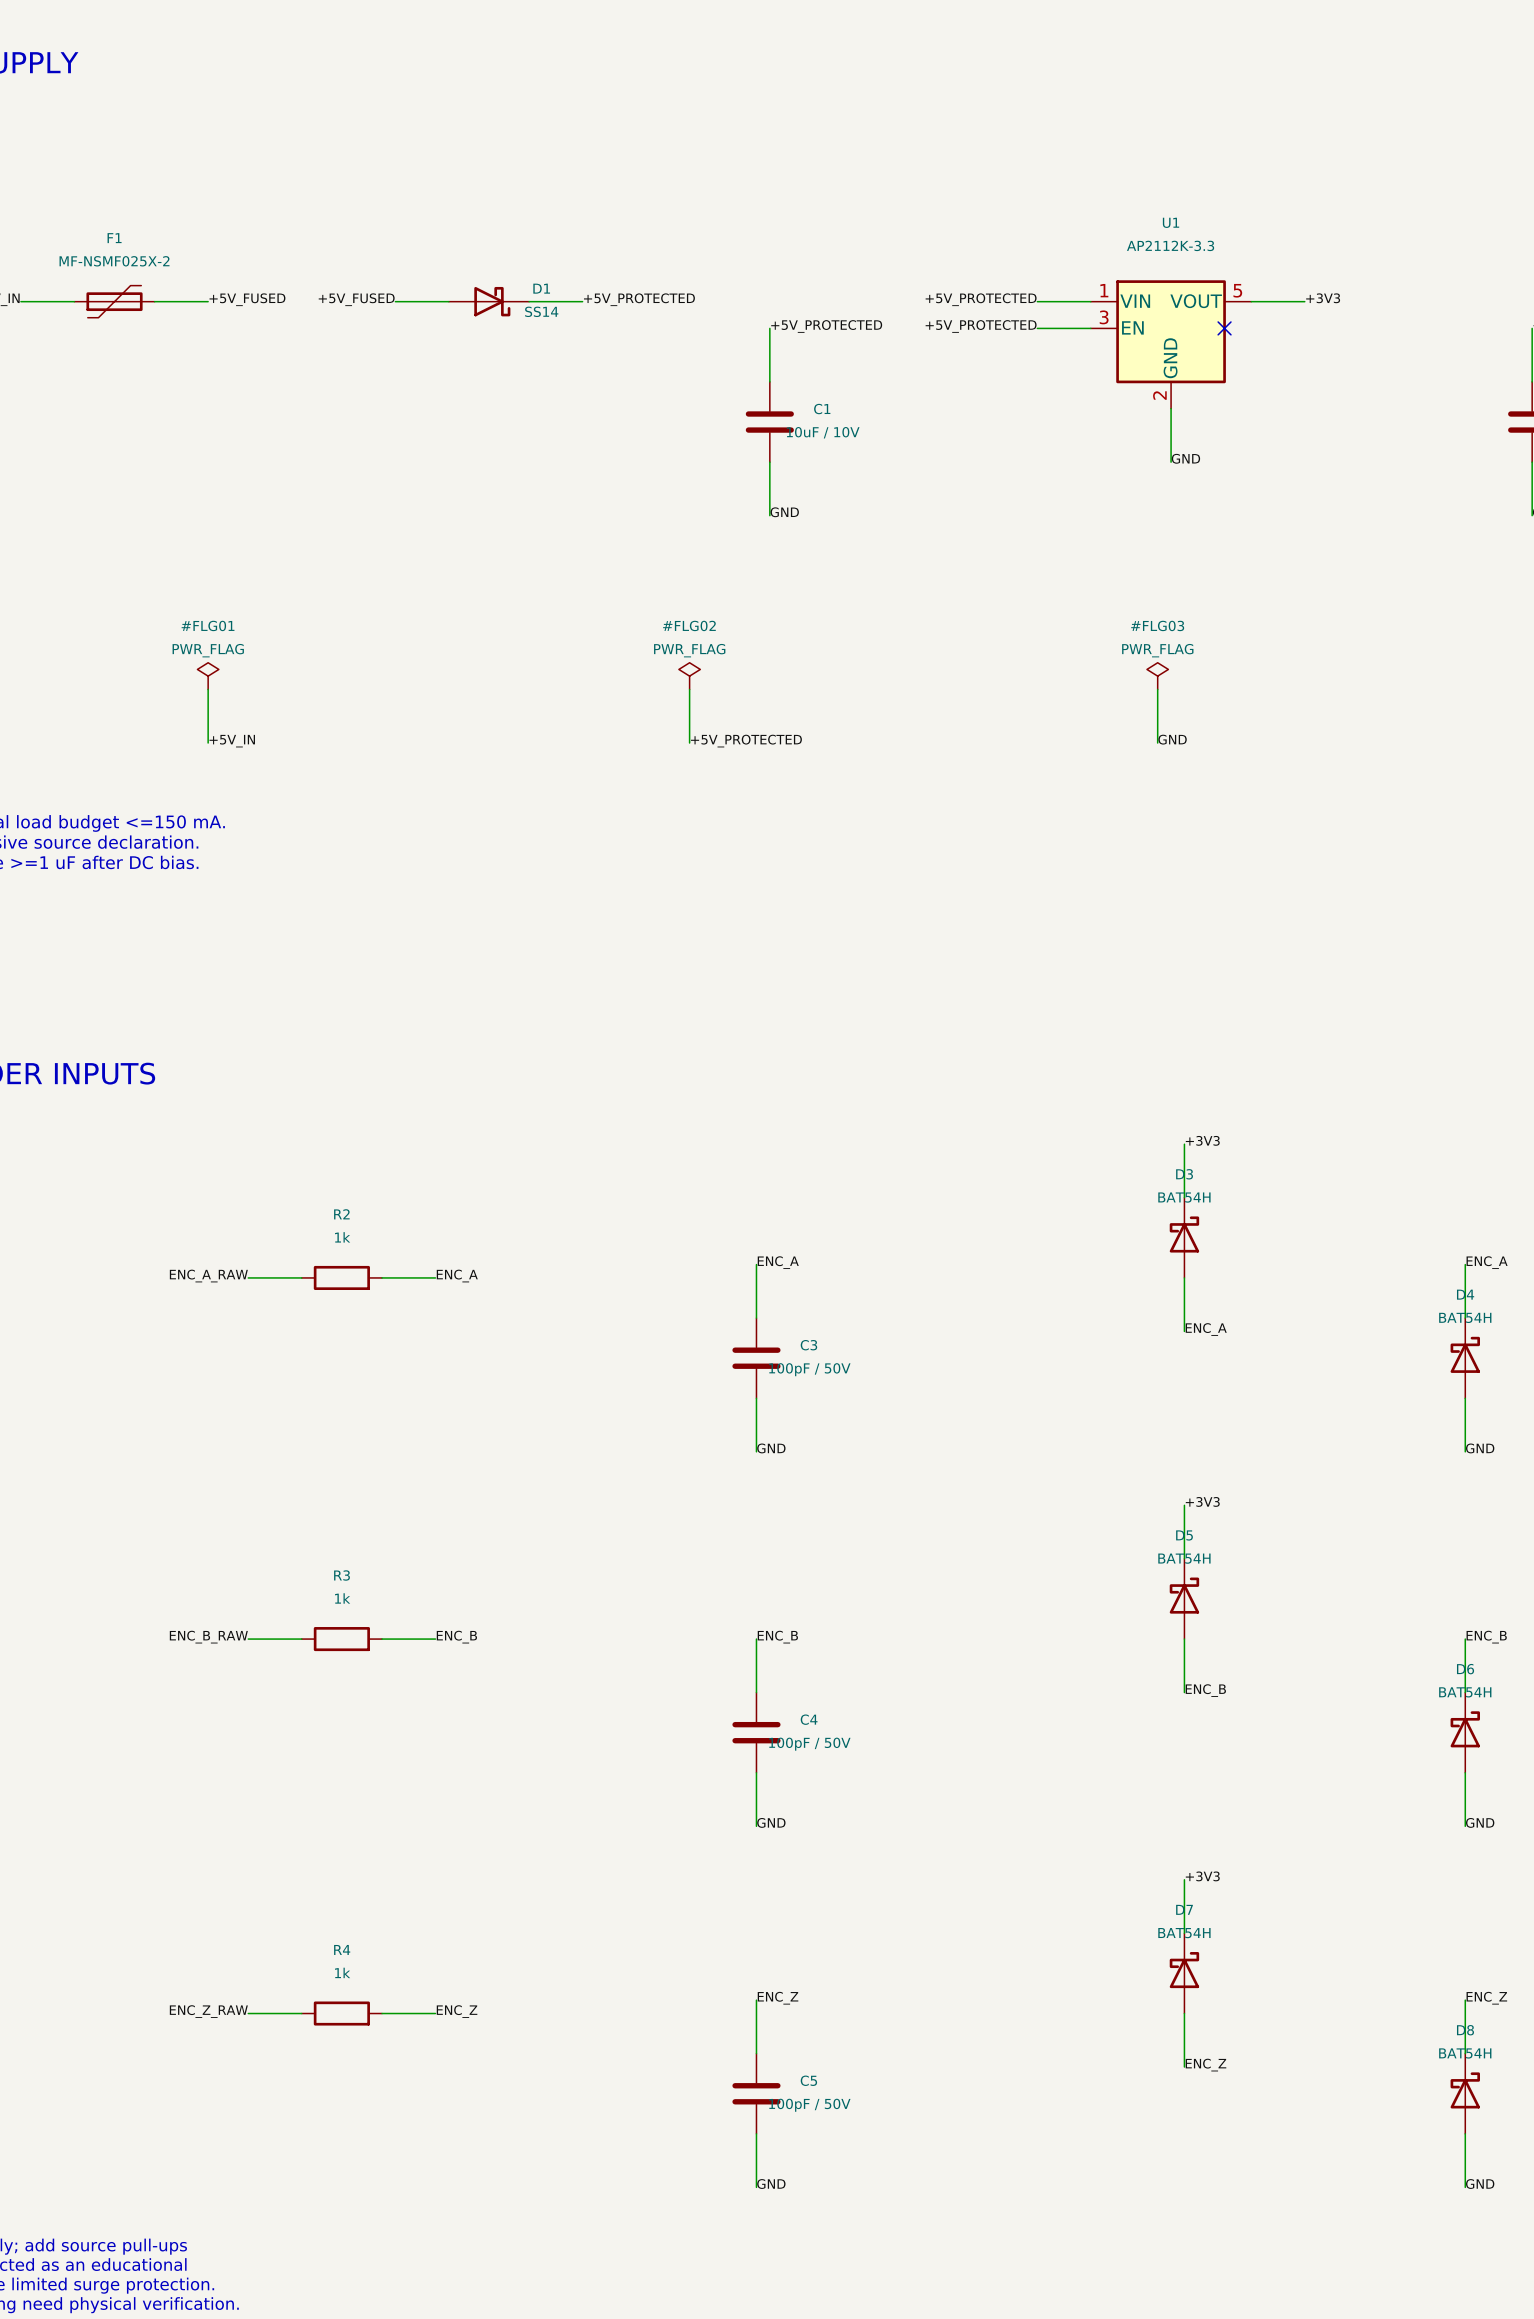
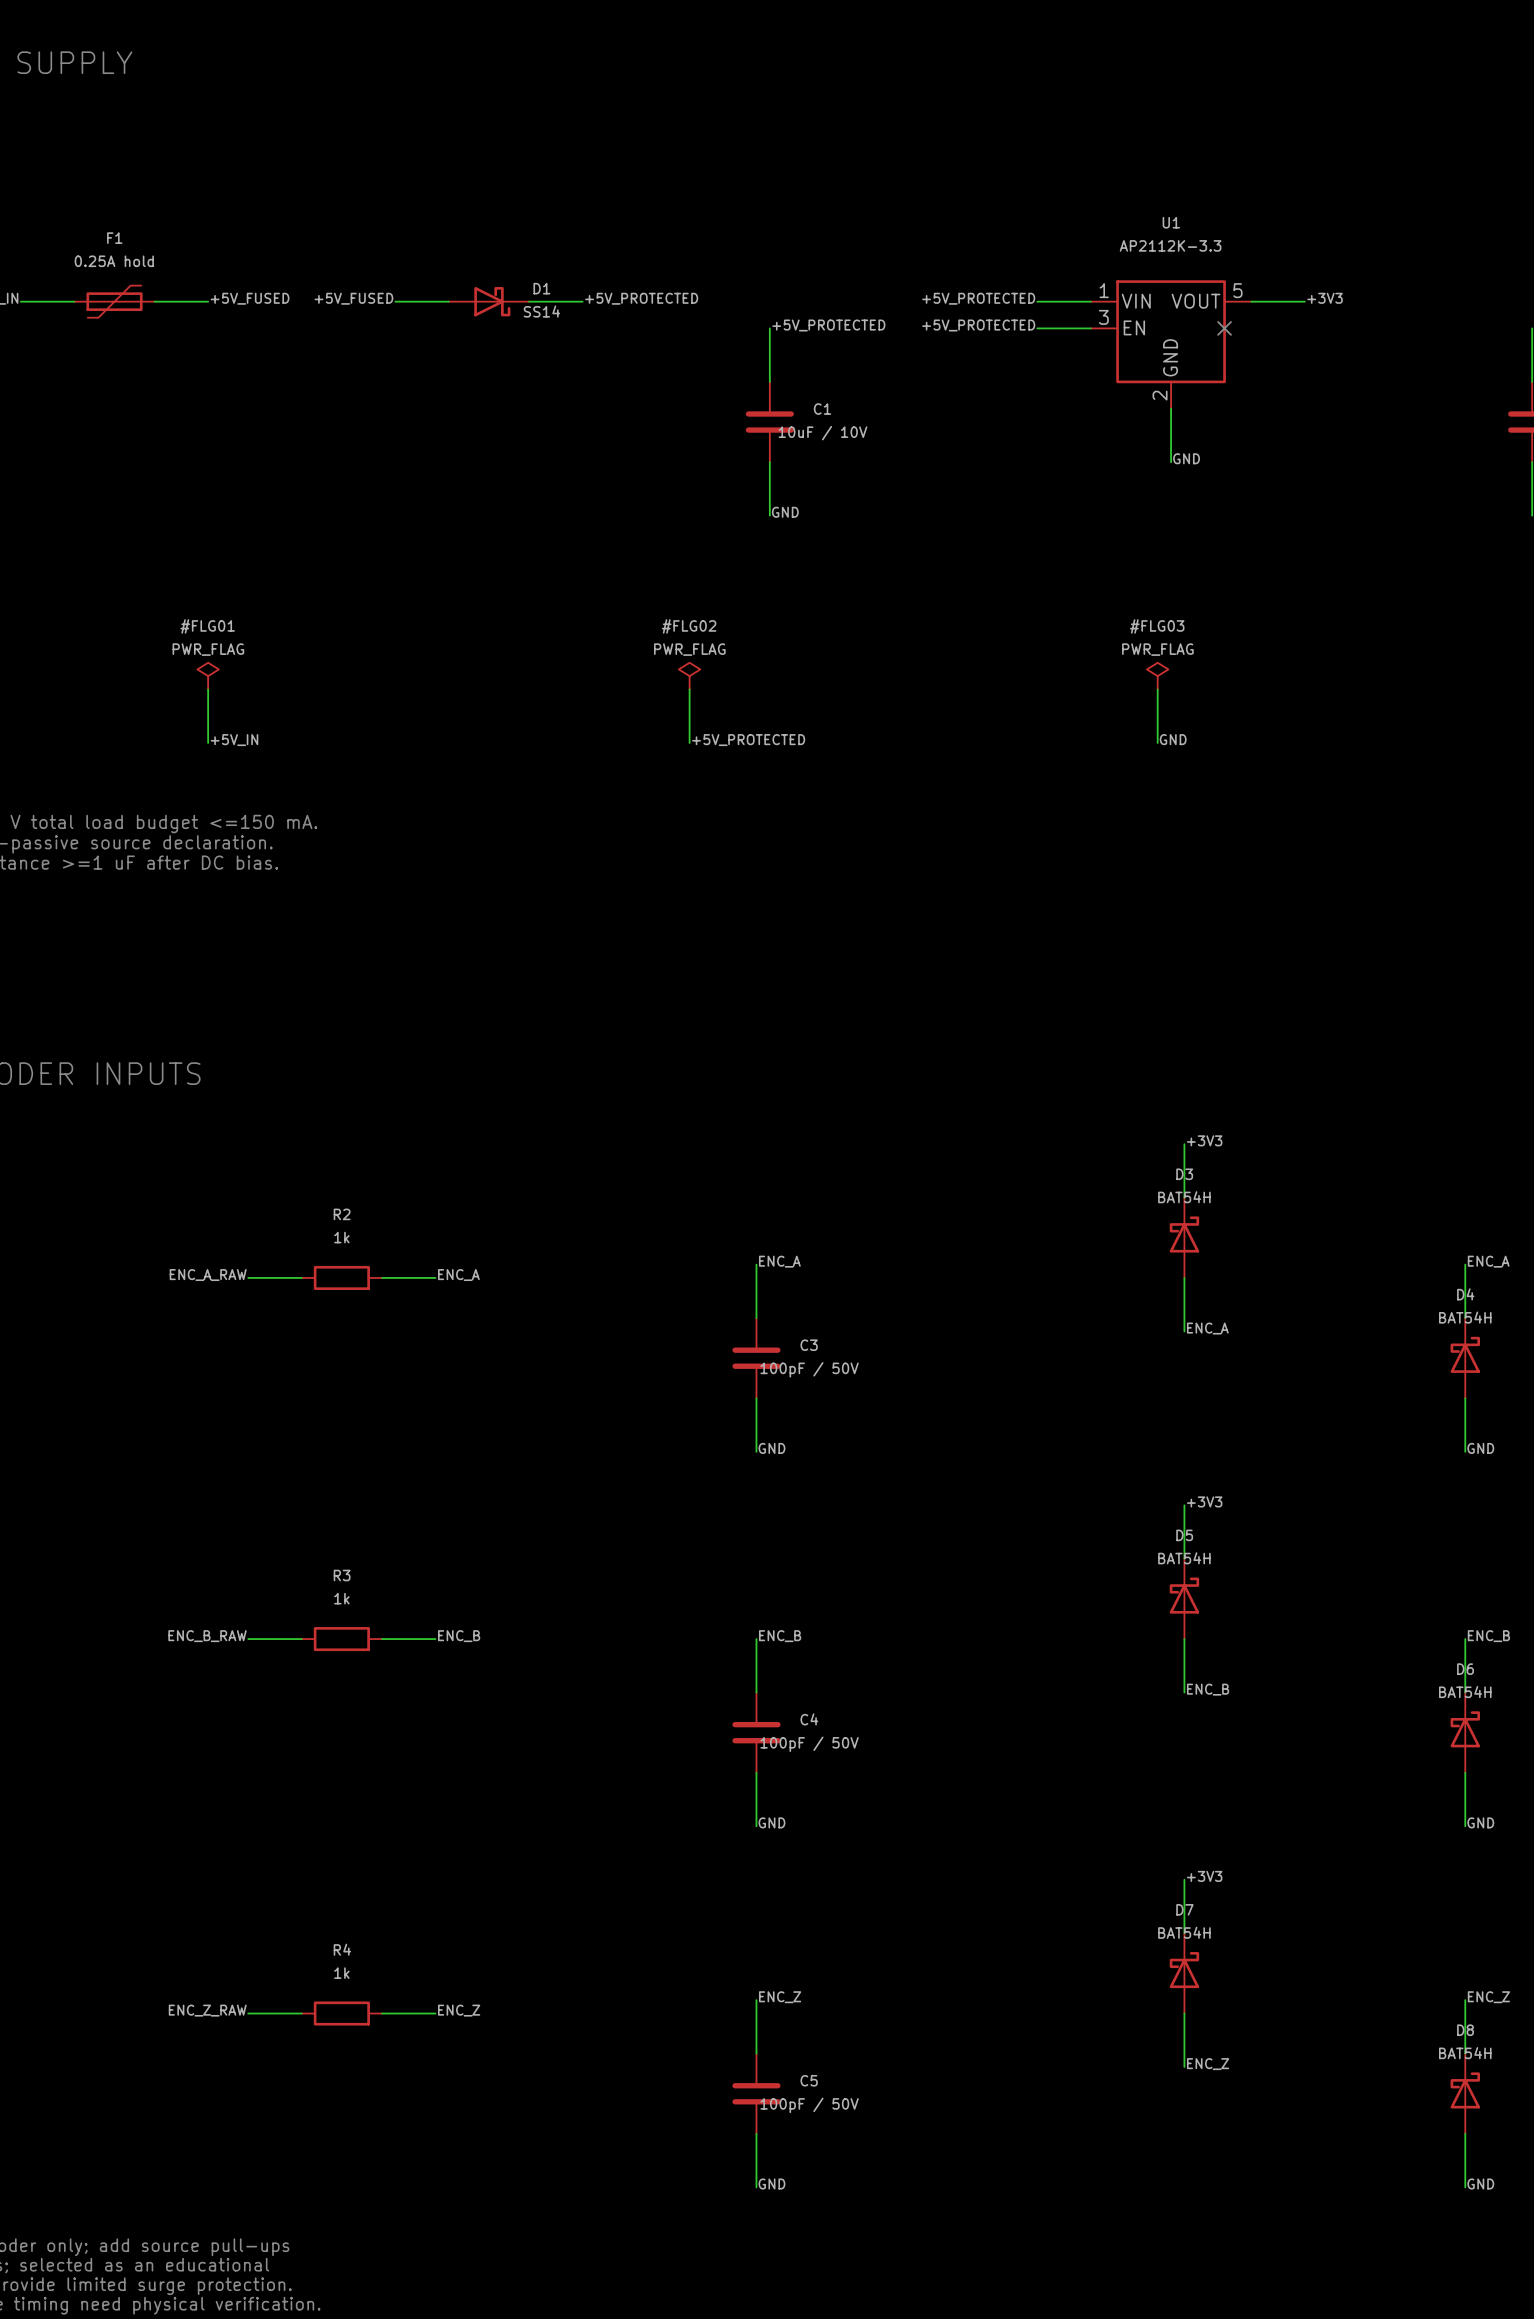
F1 value: MF-NSMF025X-2 (114, 261) -> 0.25A hold (114, 261)

